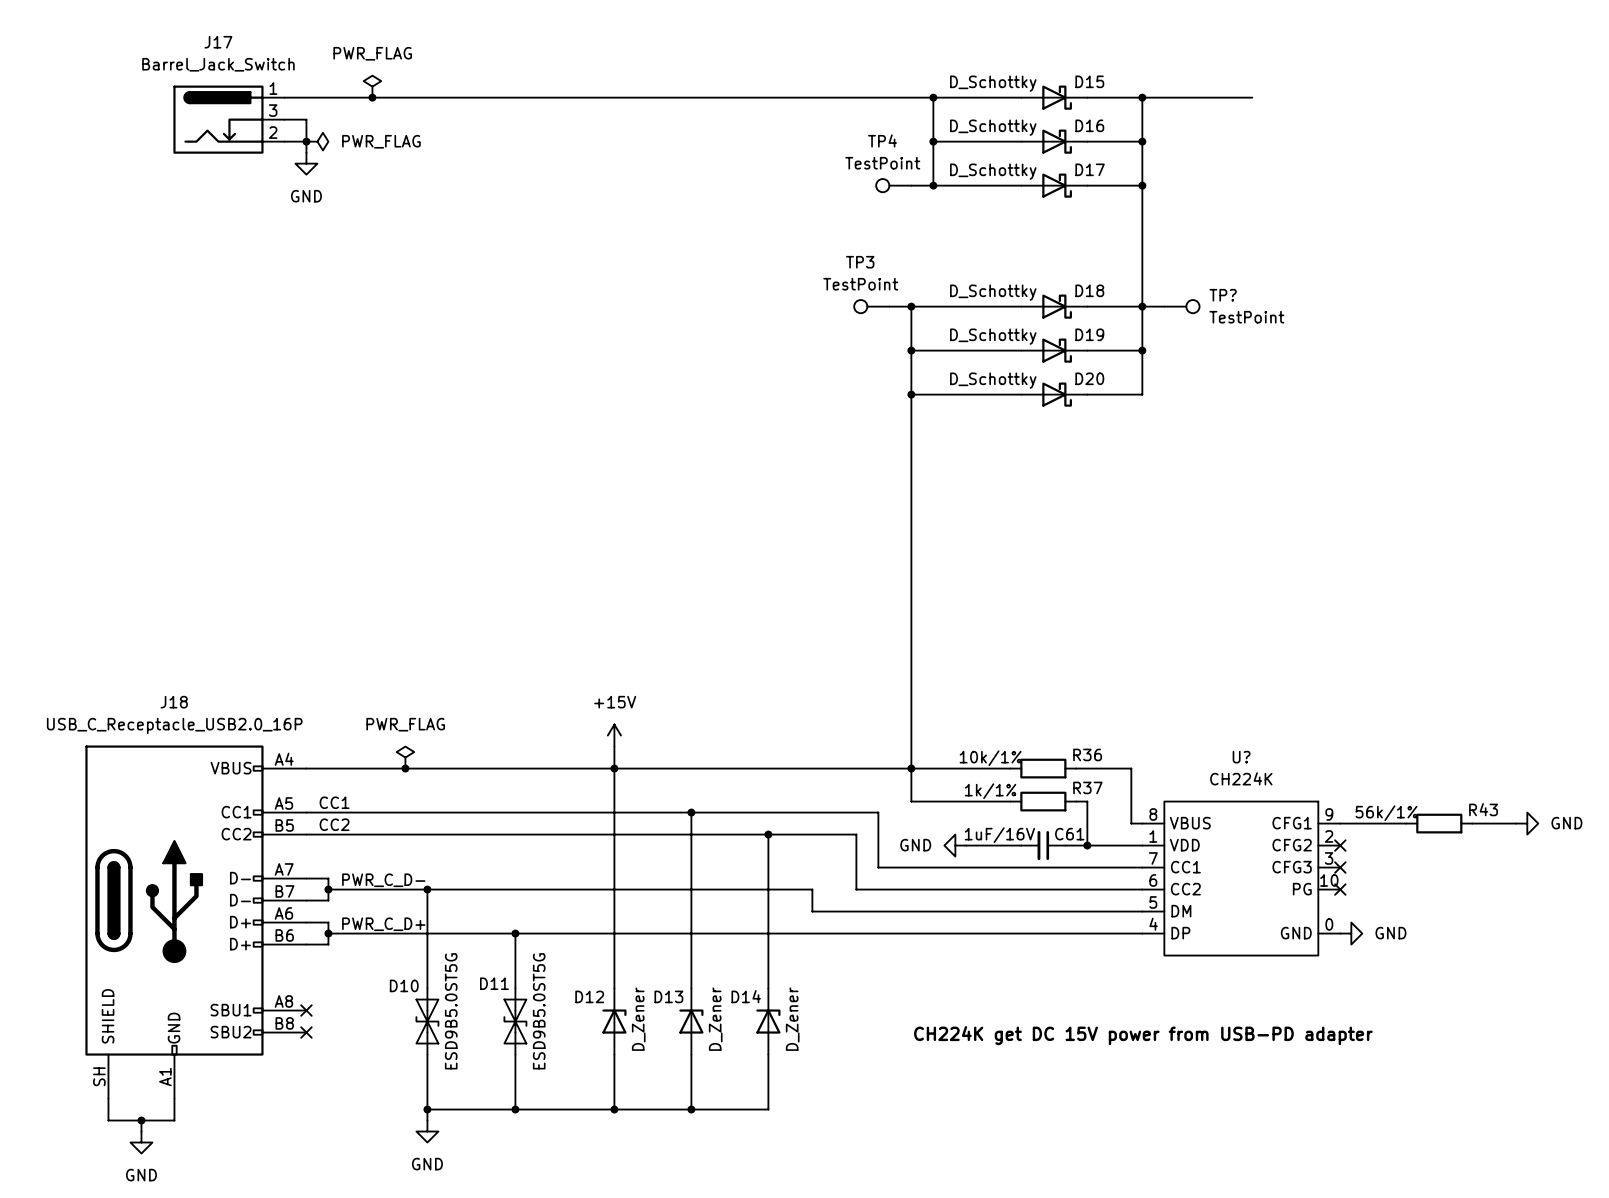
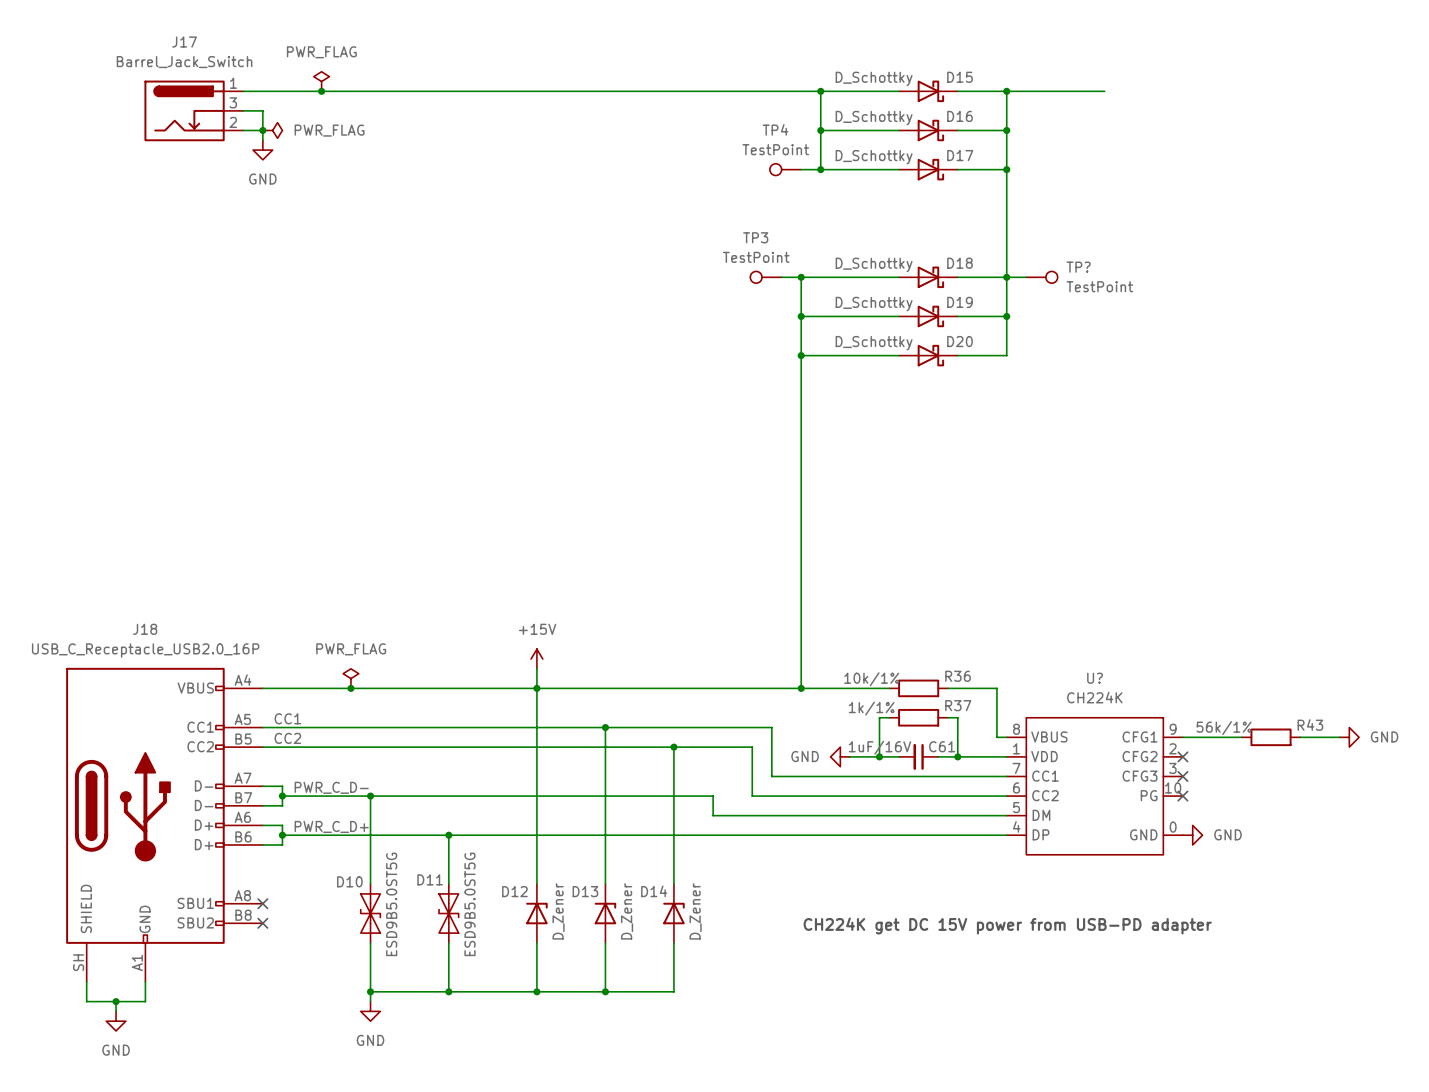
wire: (911, 768) (911, 801) (999, 801) -> (879, 756) (879, 717)
junction: none -> (879, 756)

